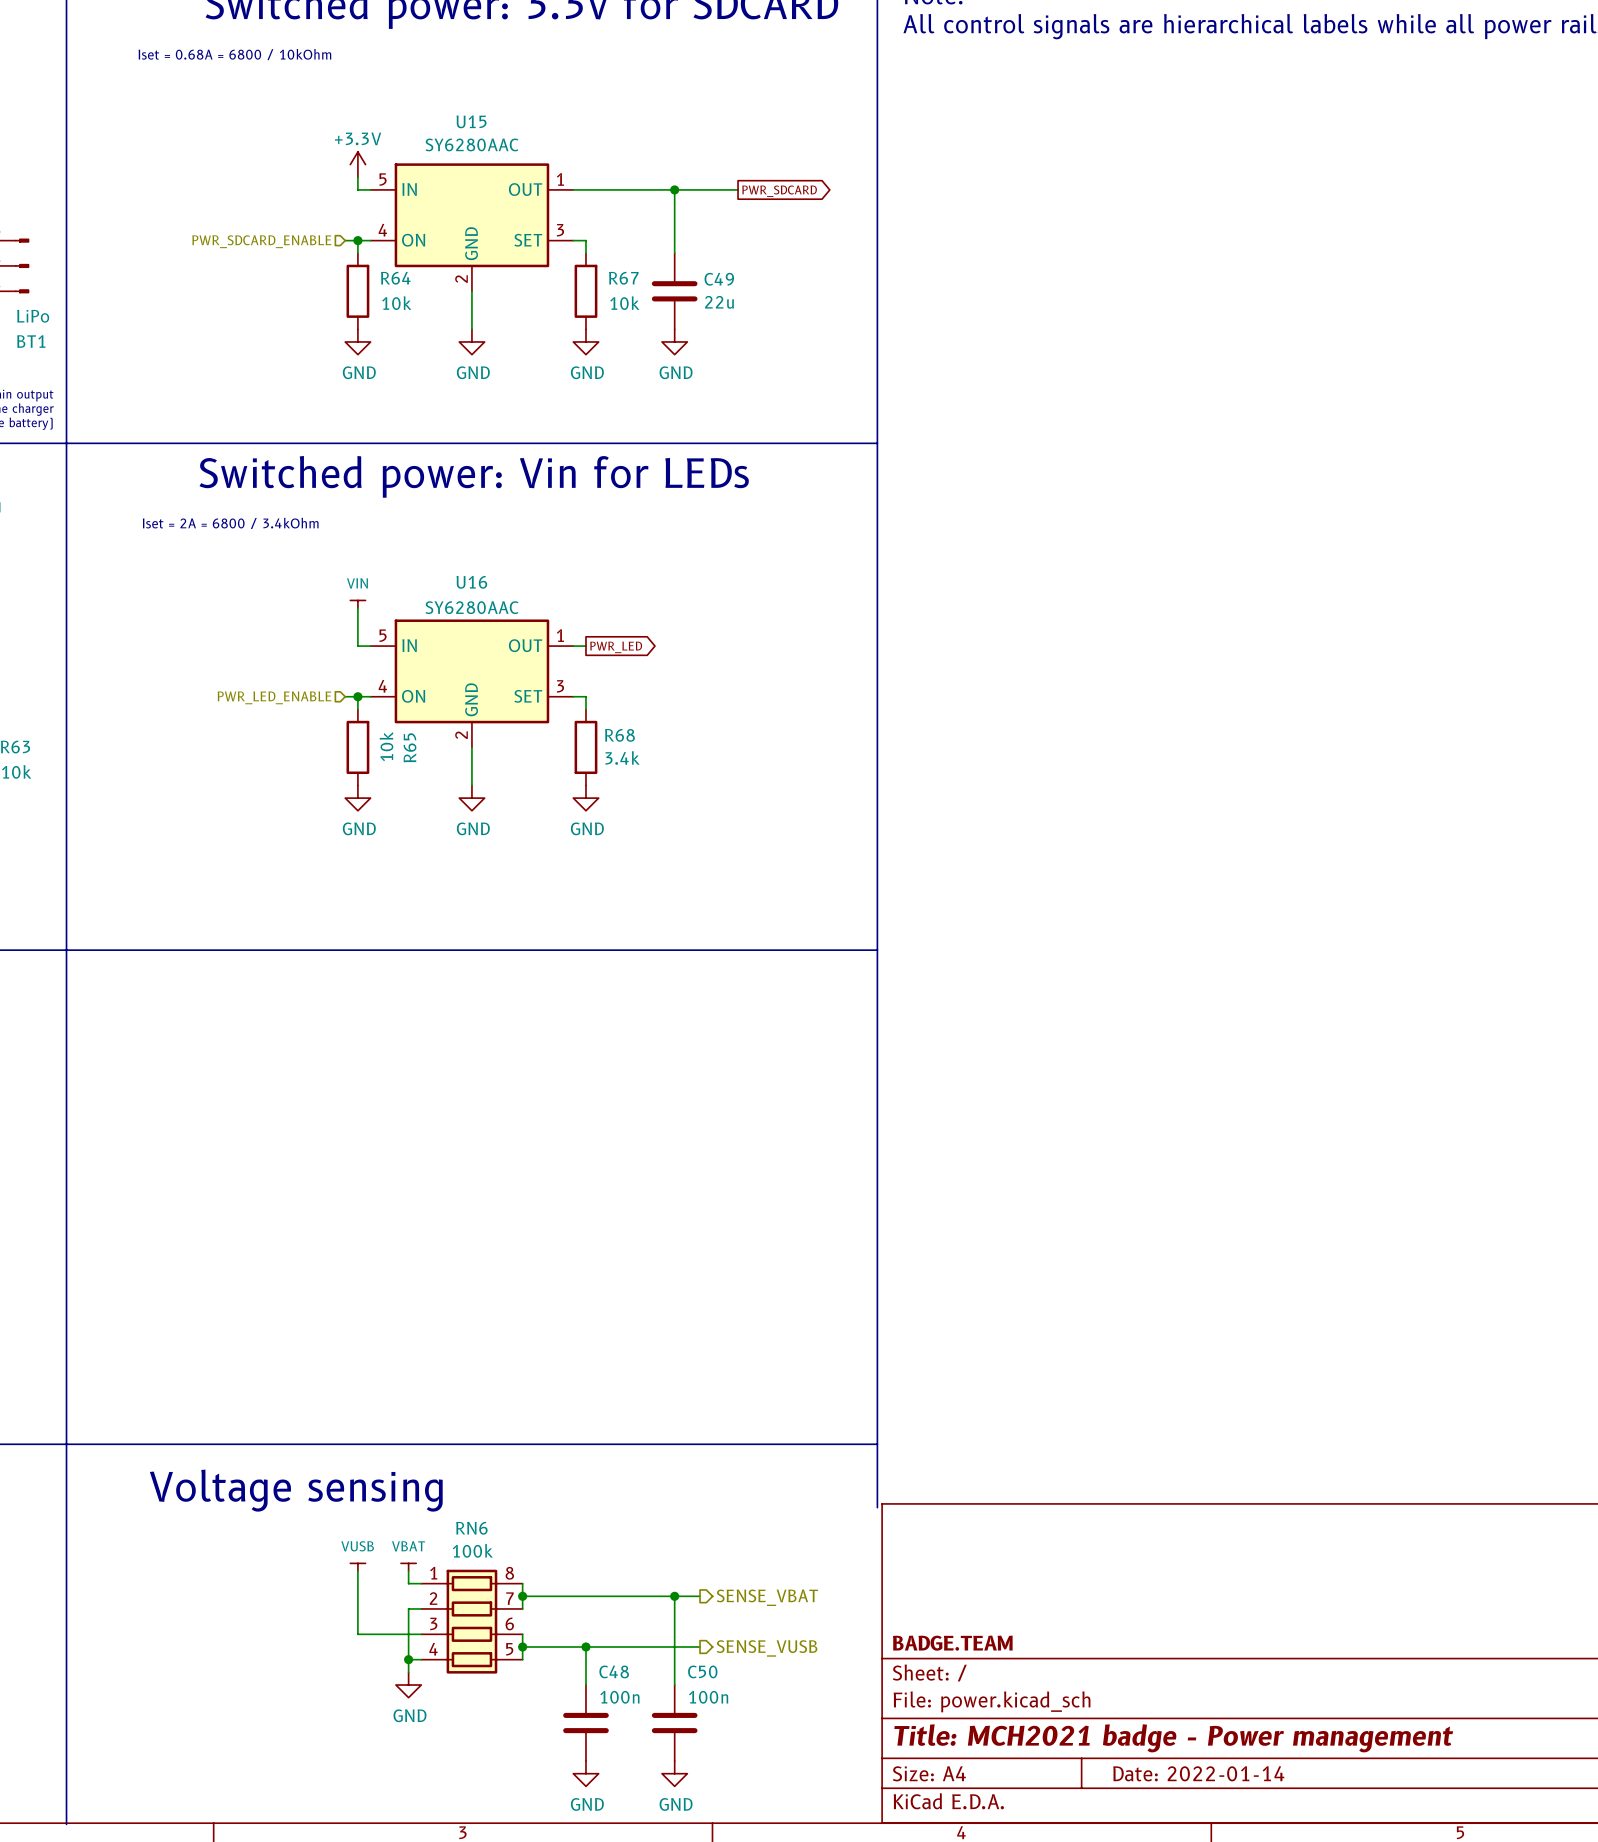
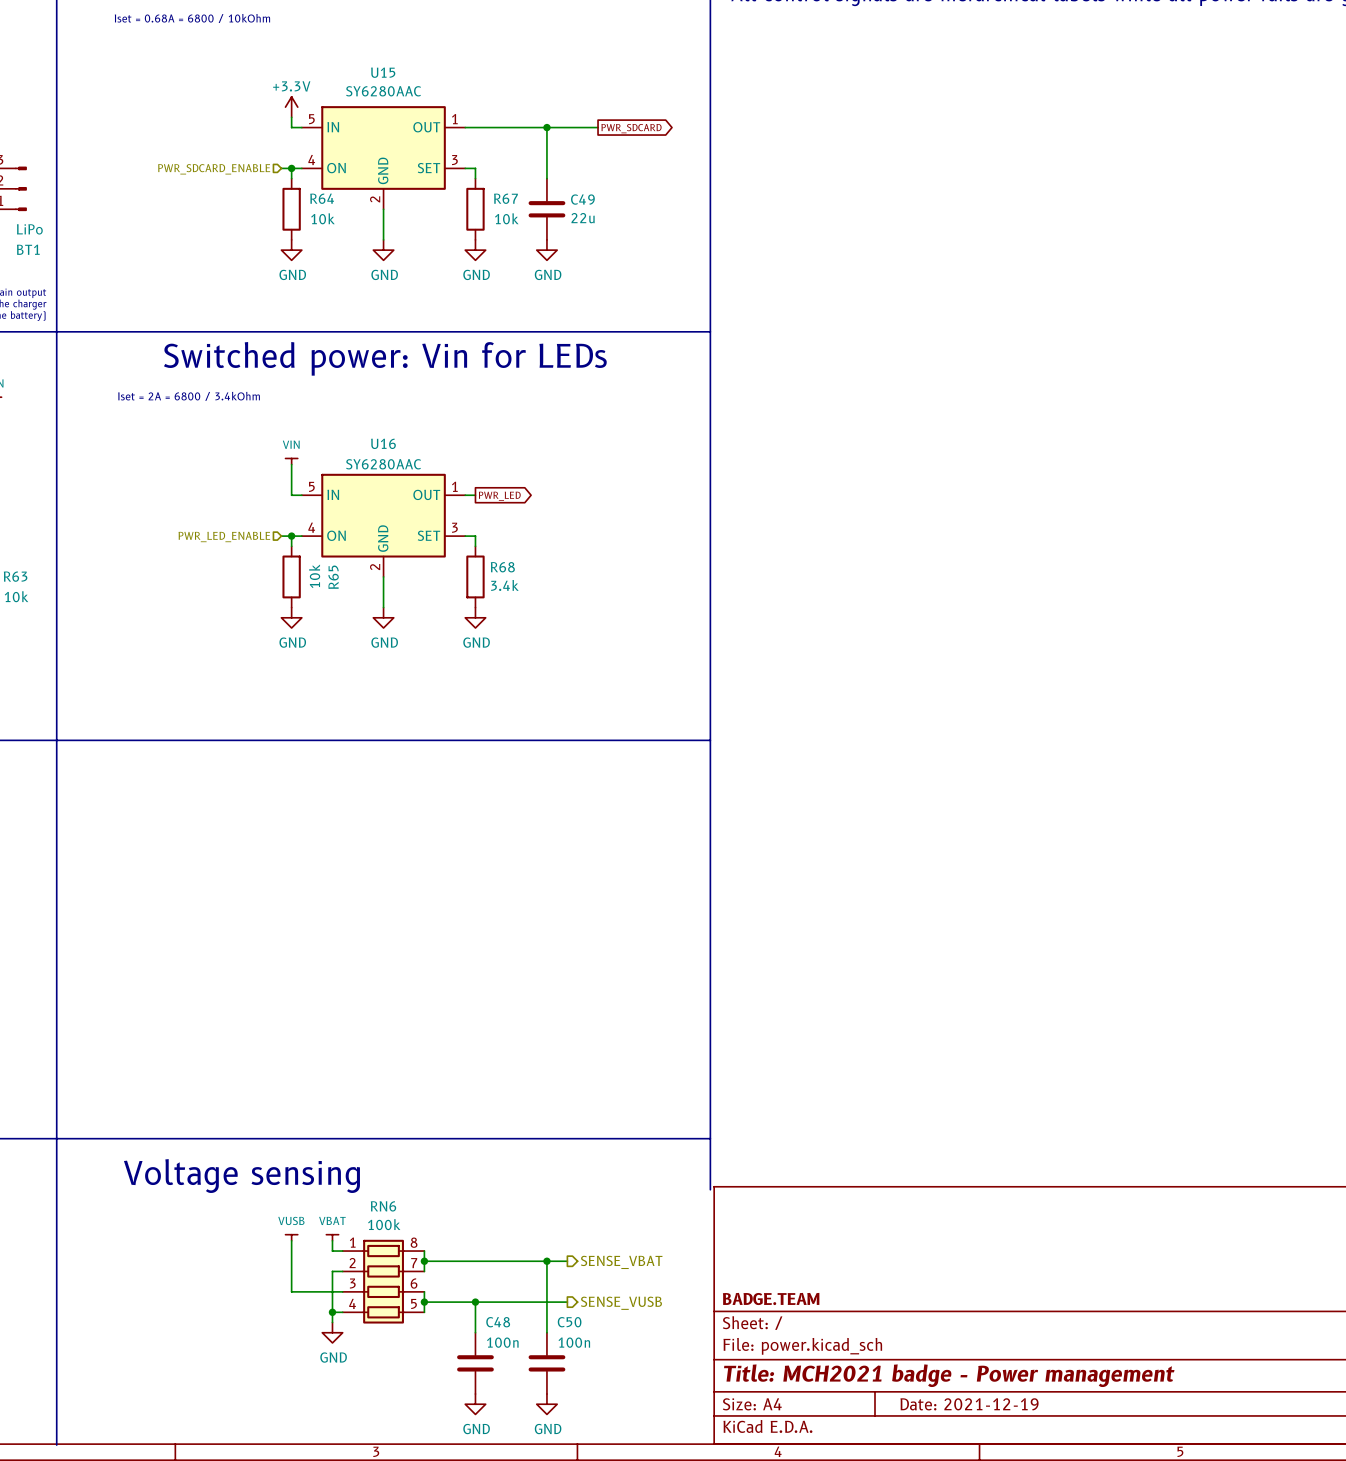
title block: Date: 2022-01-14 (1198, 1773) -> Date: 2021-12-19 (969, 1404)

